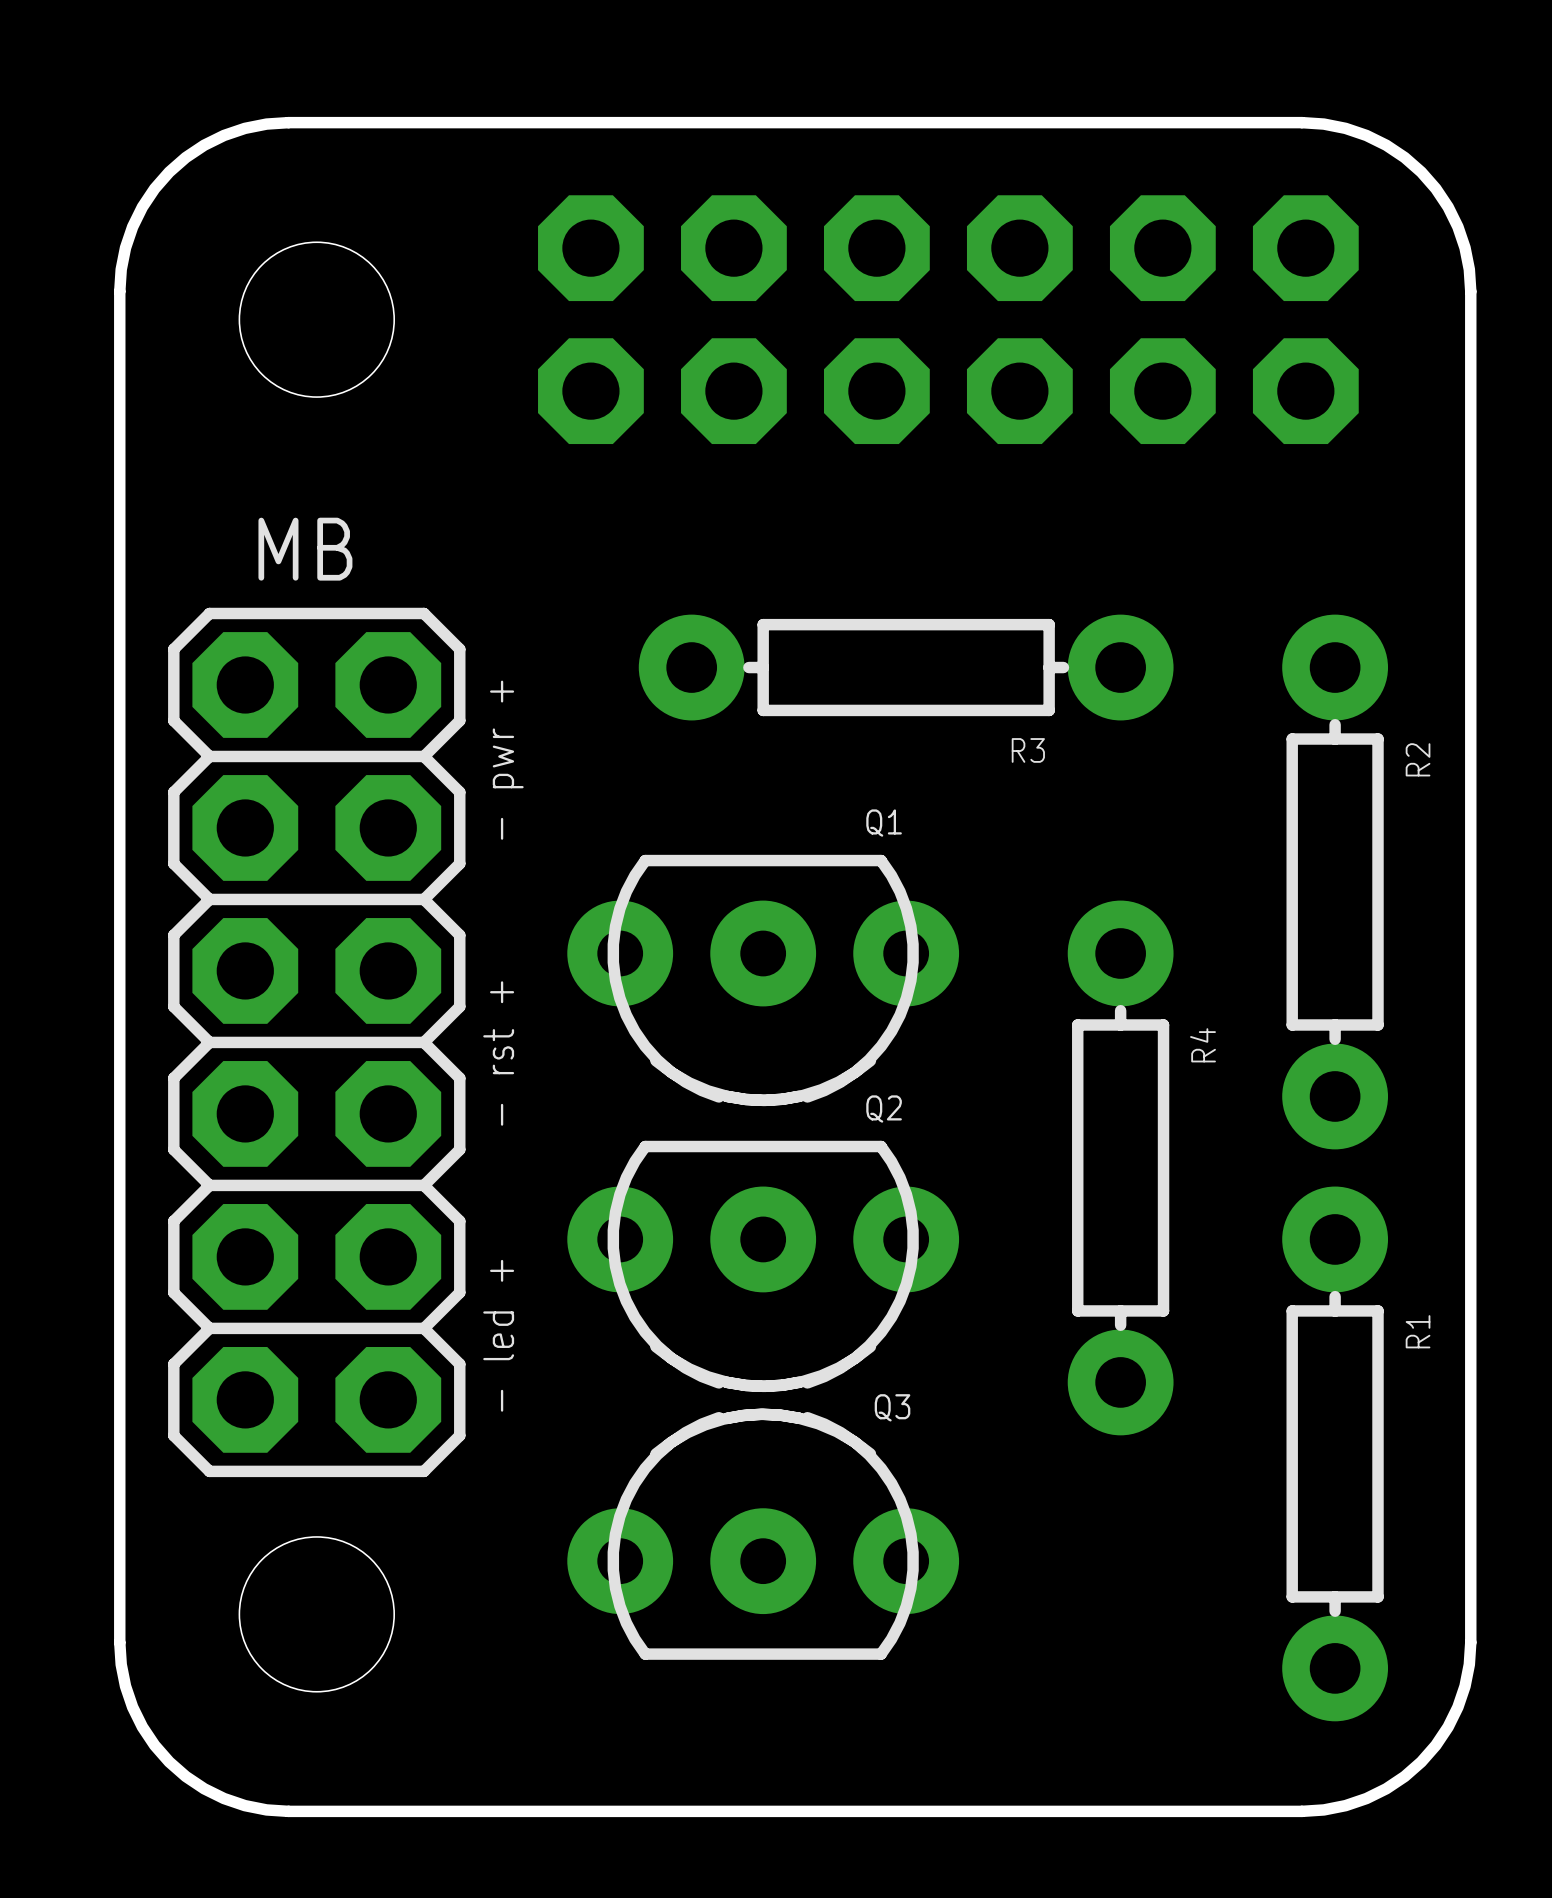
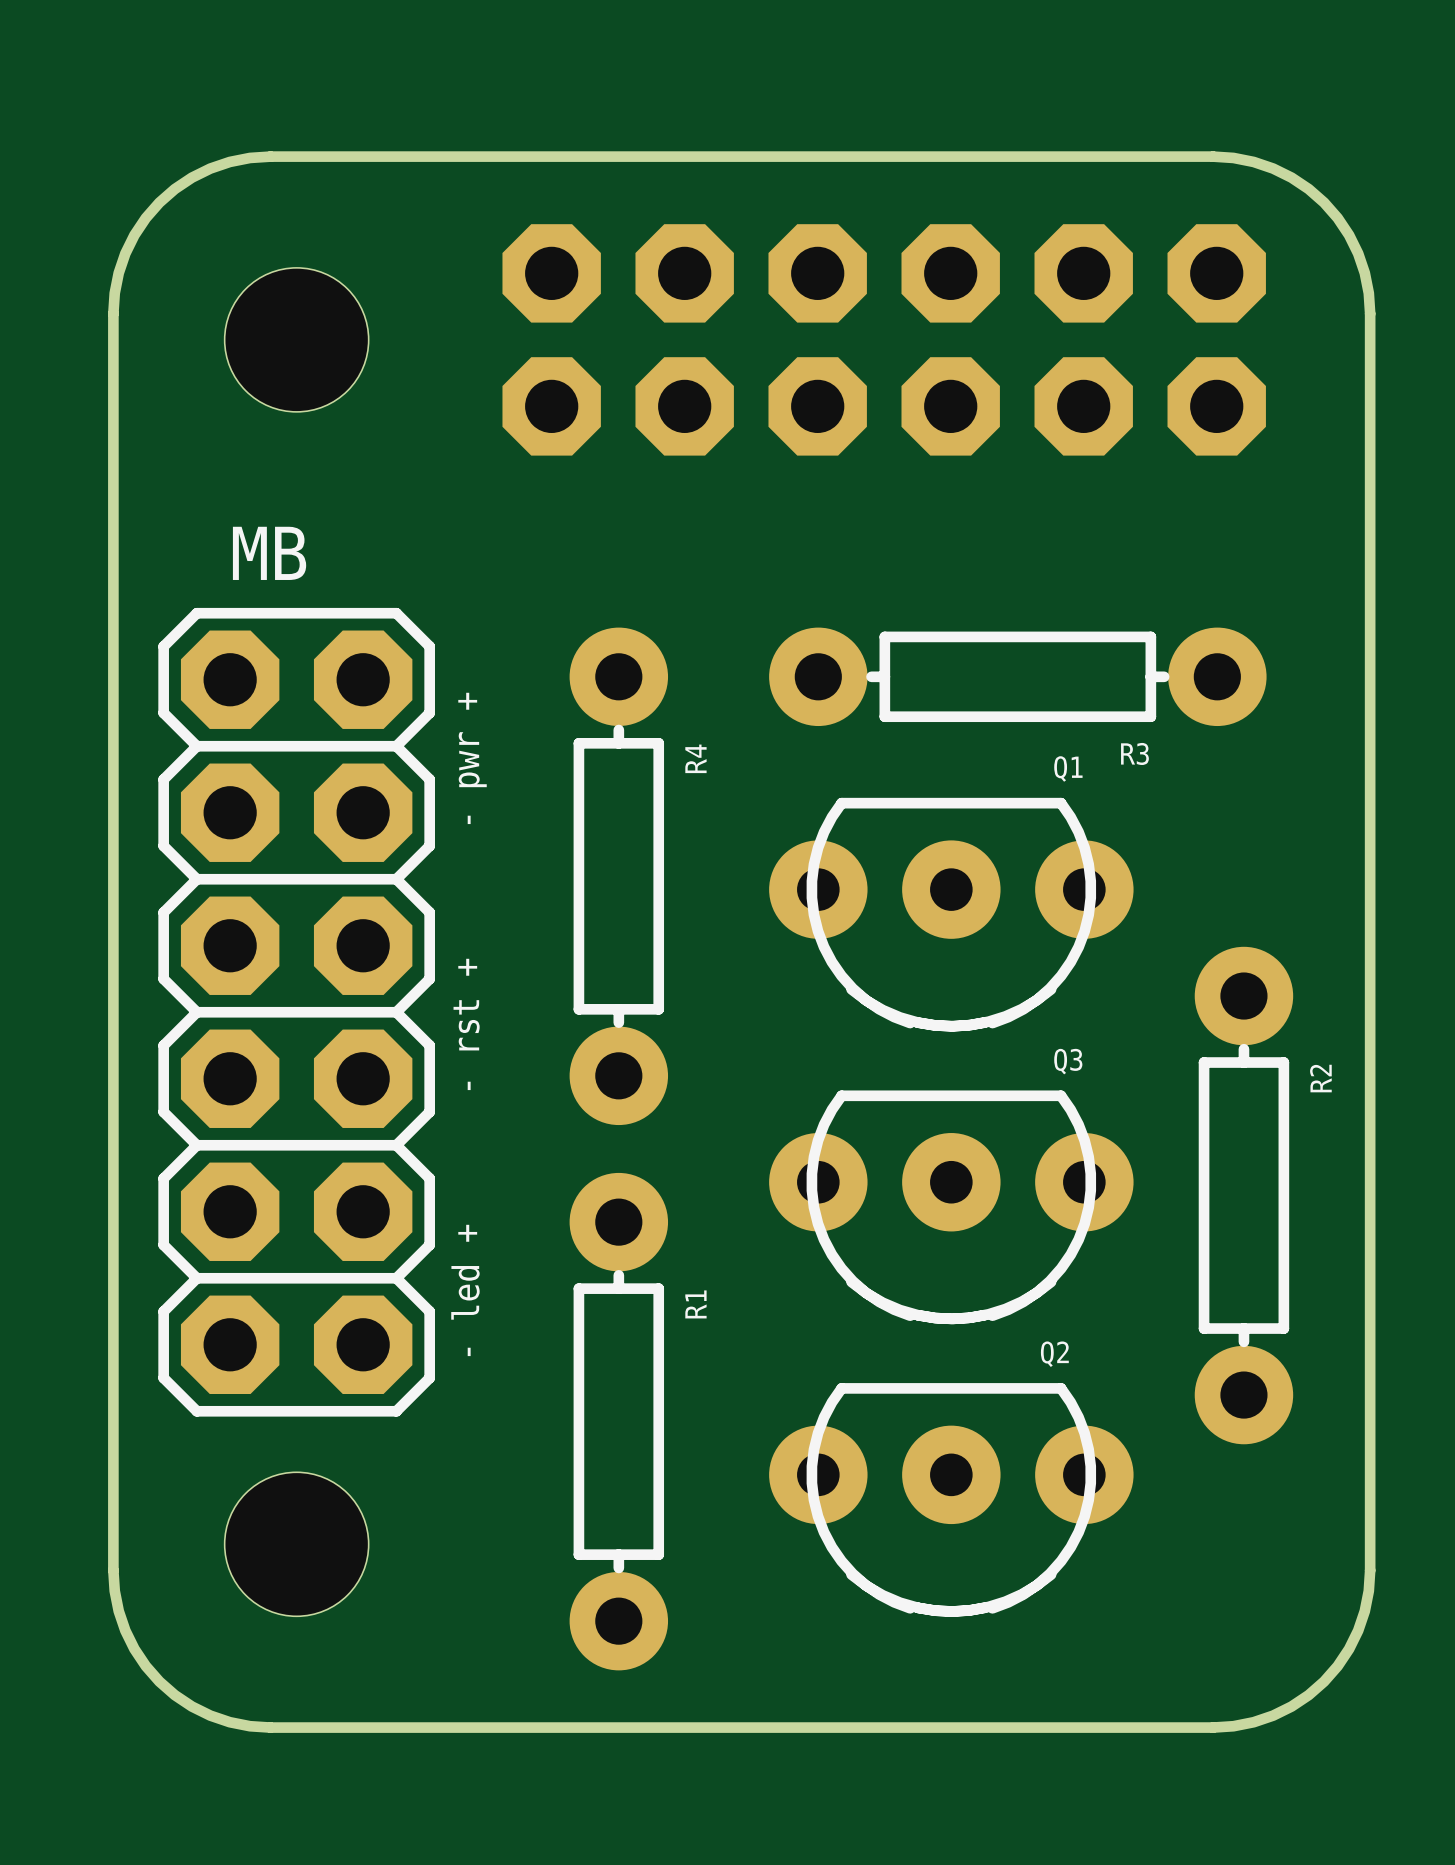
R3 position: (906, 667) -> (1017, 676)
R2 position: (1335, 882) -> (1243, 1195)
Q1 position: (763, 980) -> (951, 914)
Q2 name position: Q2 (884, 1109) -> Q2 (1054, 1354)
R4 position: (1120, 1167) -> (618, 876)
Q2 position: (763, 1266) -> (951, 1499)
R1 position: (1335, 1453) -> (618, 1421)
Q3 rotation: 0° (763, 1534) -> 180° (951, 1207)
Q3 position: (763, 1534) -> (951, 1207)

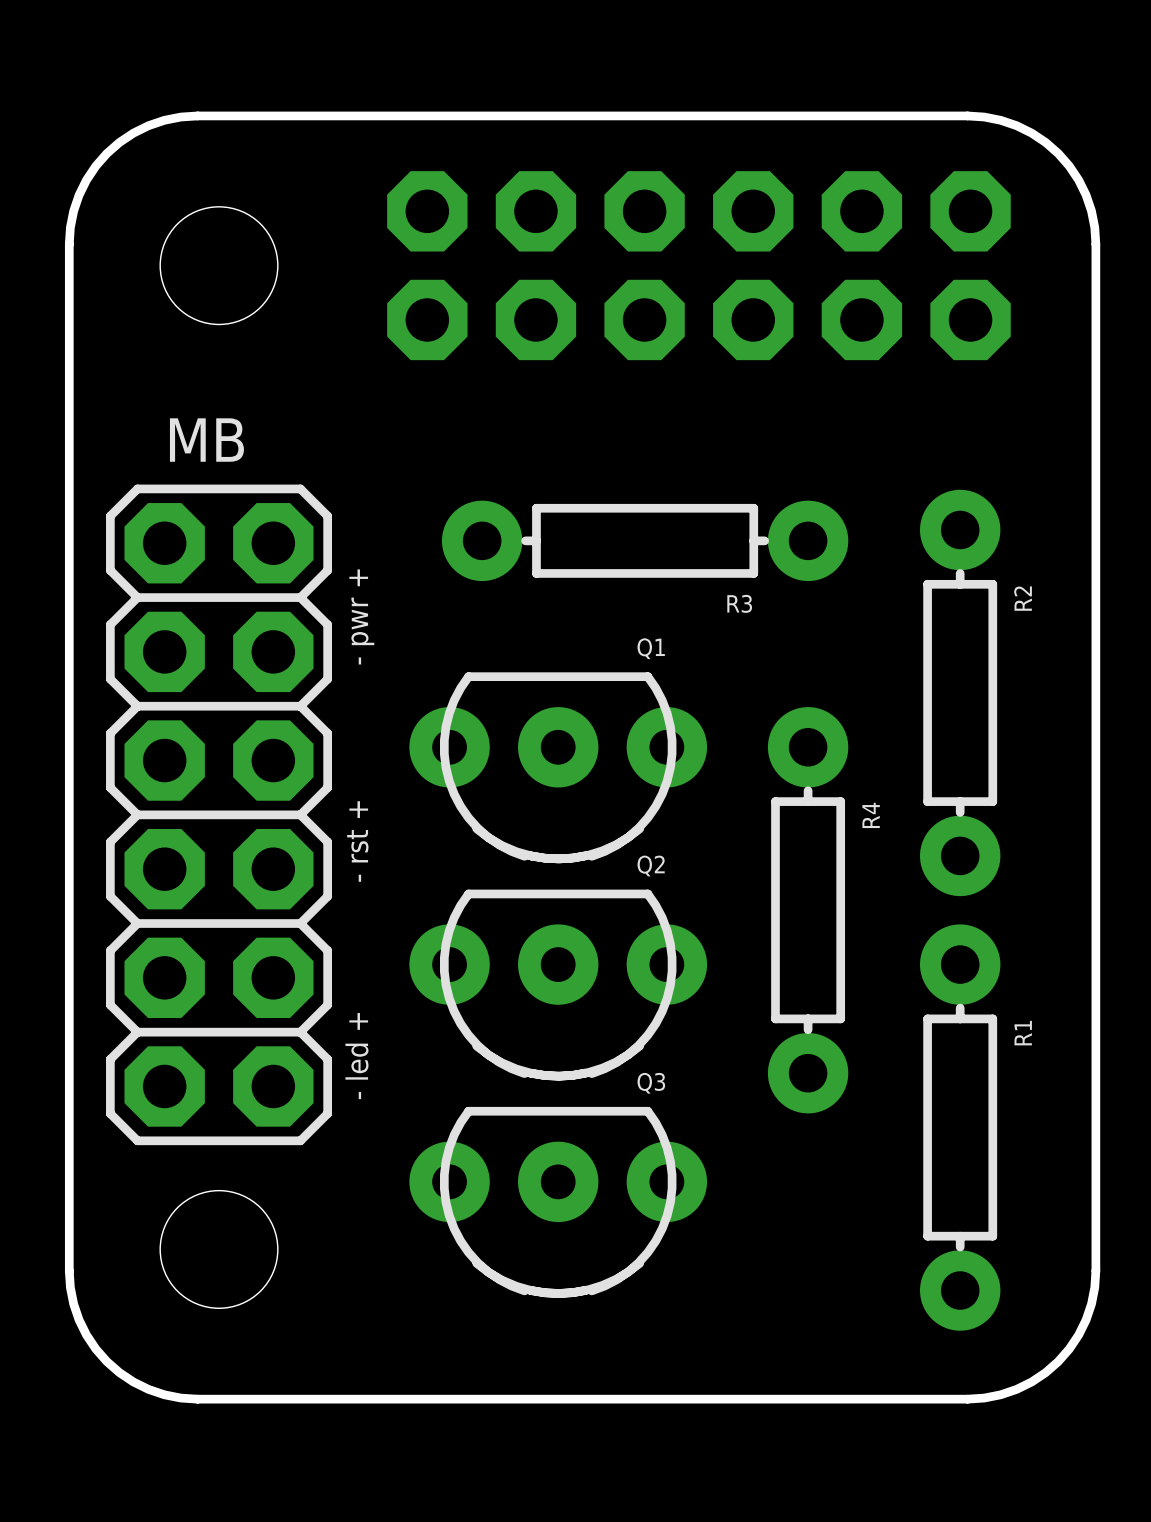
R3 position: (1017, 676) -> (645, 540)
R4 position: (618, 876) -> (808, 910)
Q1 position: (951, 914) -> (558, 767)
R2 position: (1243, 1195) -> (960, 692)
Q3 position: (951, 1207) -> (558, 1202)
Q2 name position: Q2 (1054, 1354) -> Q2 (651, 866)
R1 position: (618, 1421) -> (960, 1127)
Q2 position: (951, 1499) -> (558, 985)

